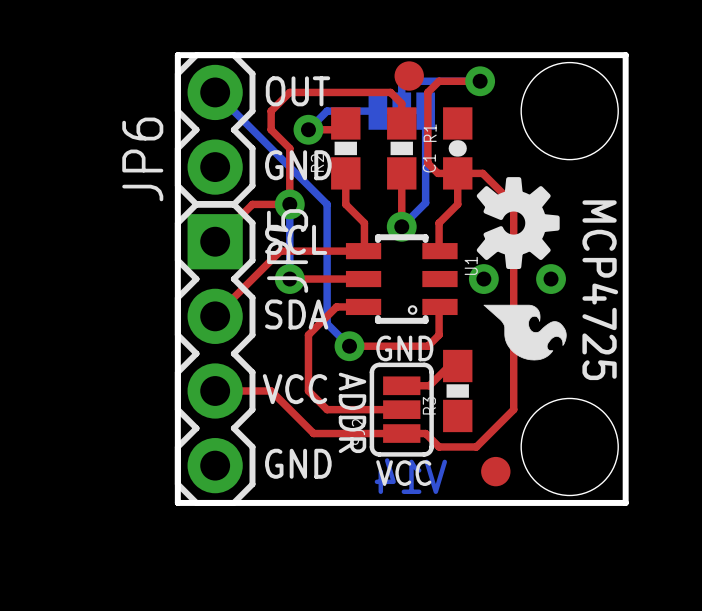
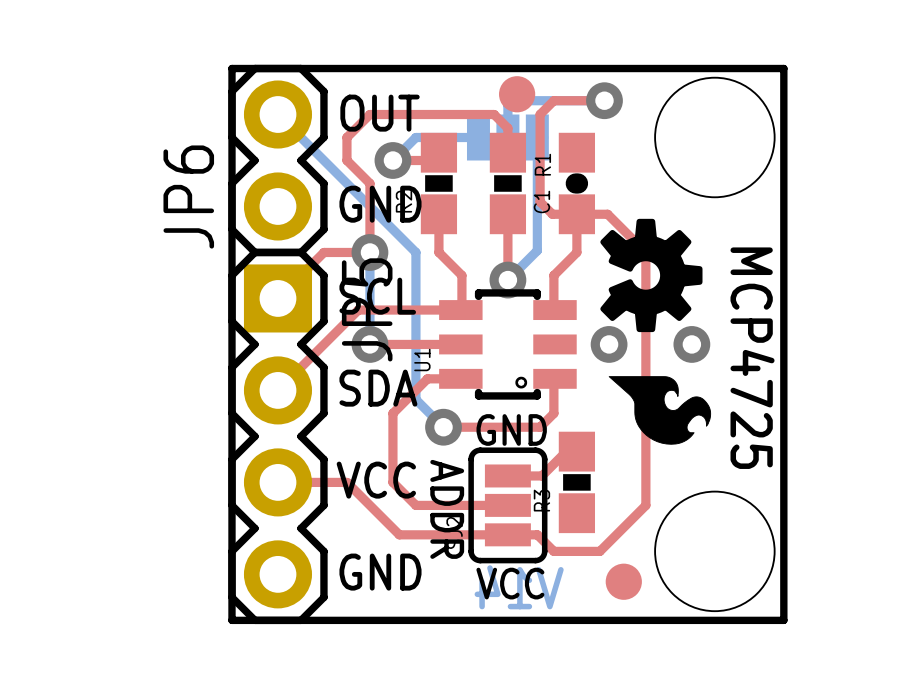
U1 name position: U1 (471, 265) -> U1 (422, 360)

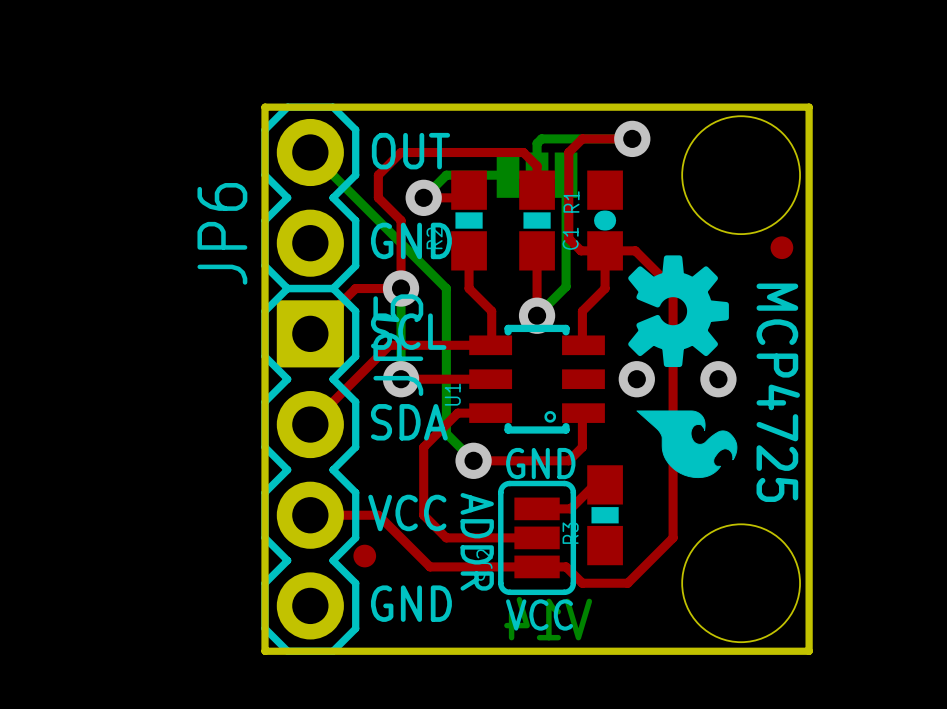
part: (517, 94) -> none
part: none -> (781, 247)
part: none -> (364, 556)
part: (623, 581) -> none

